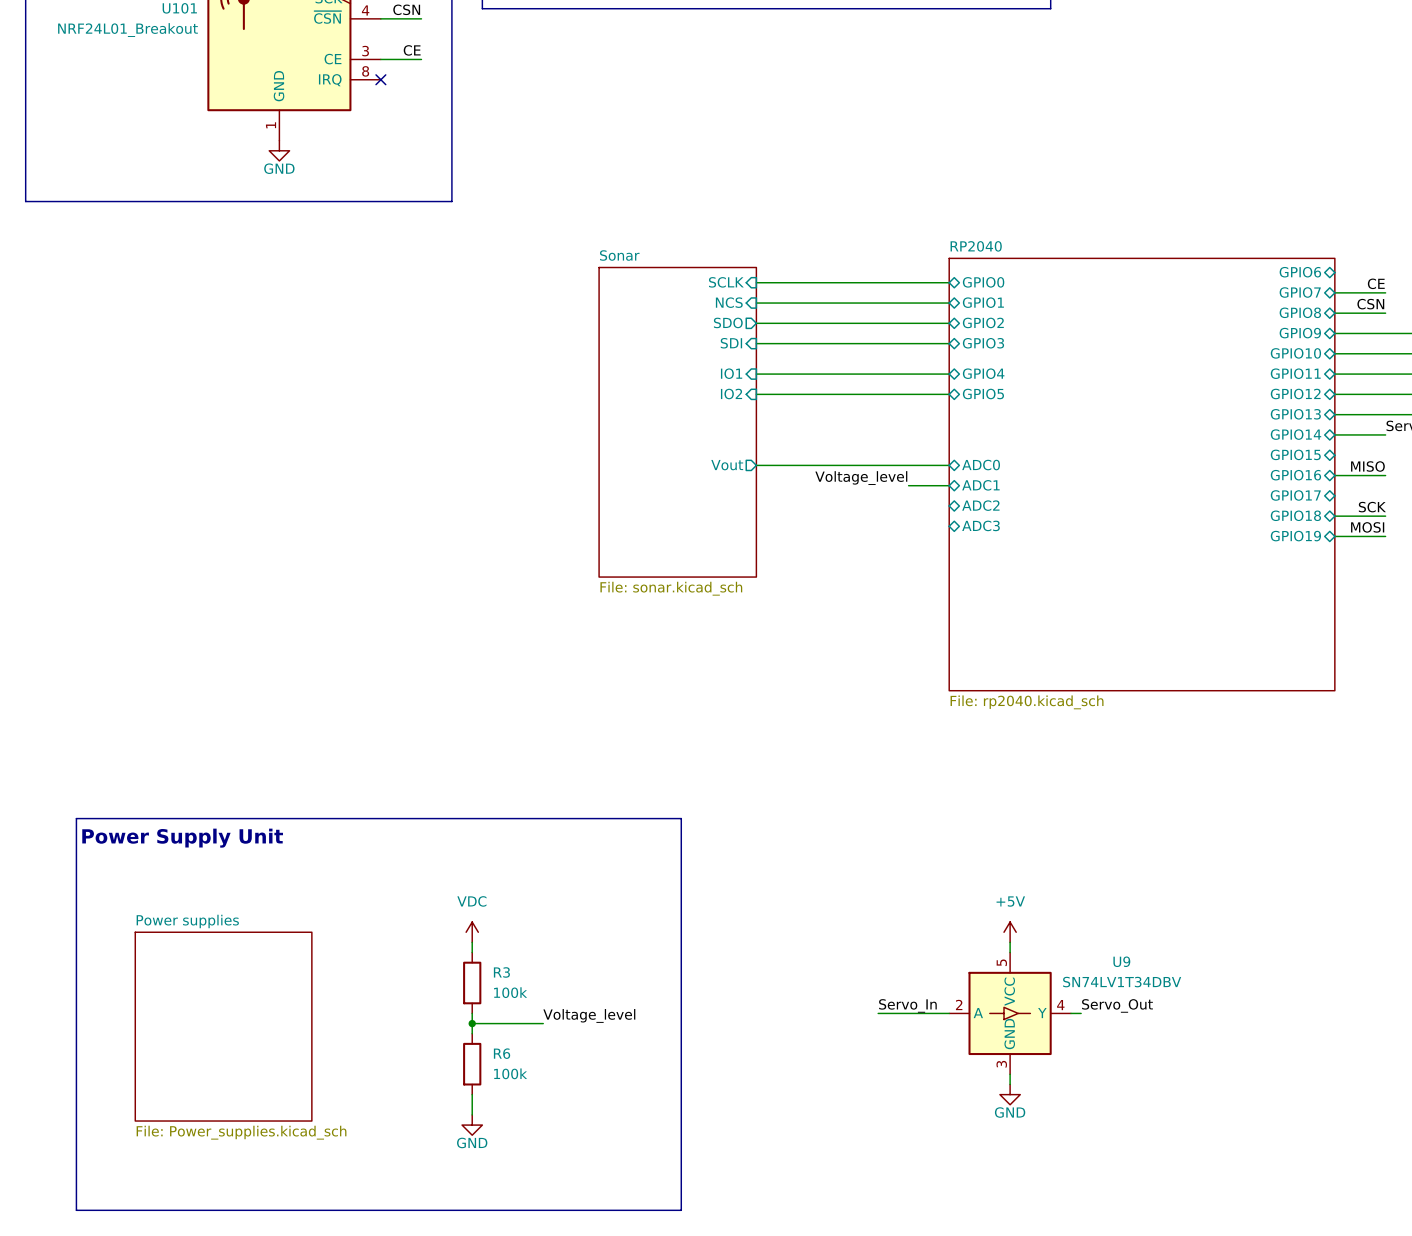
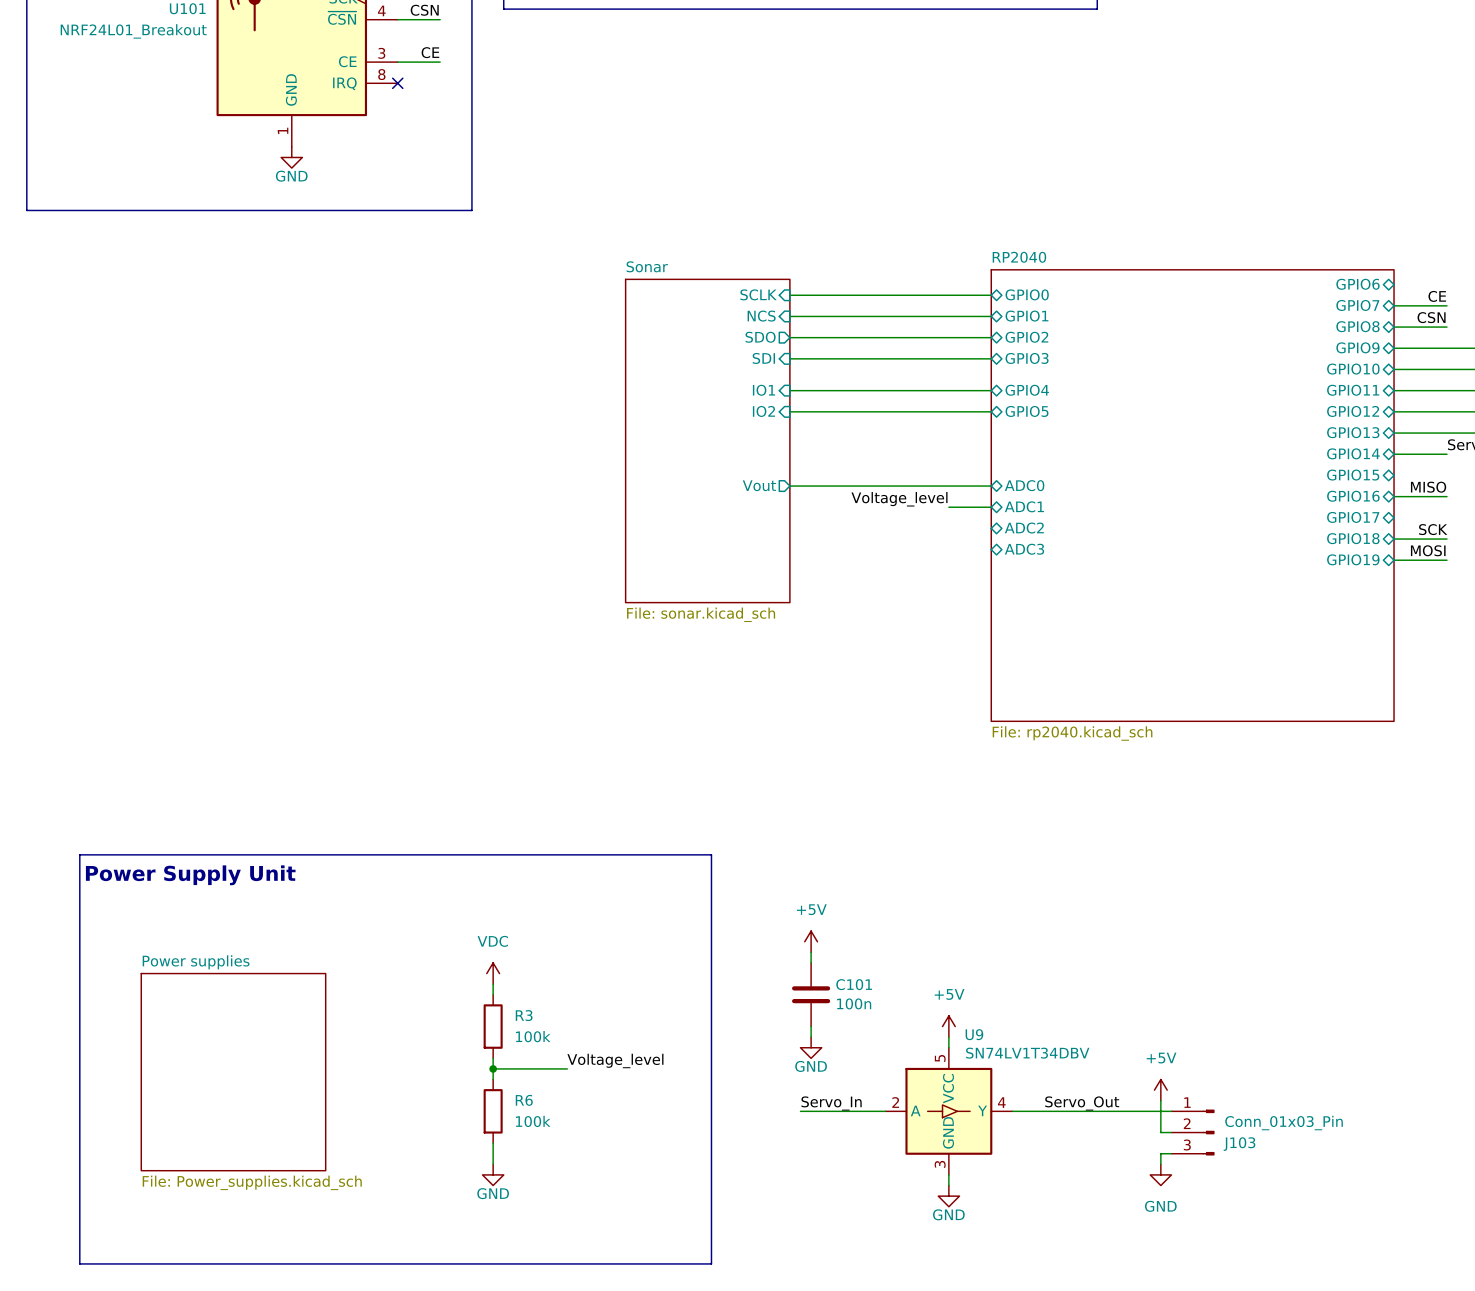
power symbol: none -> +5V (811, 941)
wire: none -> (811, 952) (811, 962)
power symbol: +5V (1010, 932) -> none
wire: (1010, 942) (1010, 952) -> (948, 1037) (948, 1047)
C101: none -> 100n (811, 994)
U9 name position: U9 (1121, 961) -> U9 (974, 1034)
wire: none -> (811, 1026) (811, 1037)
power symbol: none -> +5V (948, 1026)
U9 value position: SN74LV1T34DBV (1122, 982) -> SN74LV1T34DBV (1027, 1053)
power symbol: none -> GND (811, 1047)
label position: Servo_In (907, 1005) -> Servo_In (831, 1103)
label position: Servo_Out (1117, 1005) -> Servo_Out (1082, 1103)
wire: (878, 1013) (949, 1013) -> none
U9 position: (1010, 1013) -> (948, 1111)
wire: (1070, 1013) (1081, 1013) -> none
power symbol: none -> +5V (1160, 1090)
wire: none -> (1160, 1100) (1160, 1132) (1171, 1132)
wire: none -> (800, 1111) (885, 1111)
wire: none -> (1012, 1111) (1171, 1111)
wire: (1010, 1074) (1010, 1084) -> (948, 1174) (948, 1185)
J103: none -> Conn_01x03_Pin (1192, 1132)
power symbol: GND (1010, 1094) -> none
wire: none -> (1171, 1153) (1160, 1153) (1160, 1164)
power symbol: none -> GND (1160, 1174)
power symbol: none -> GND (948, 1196)

